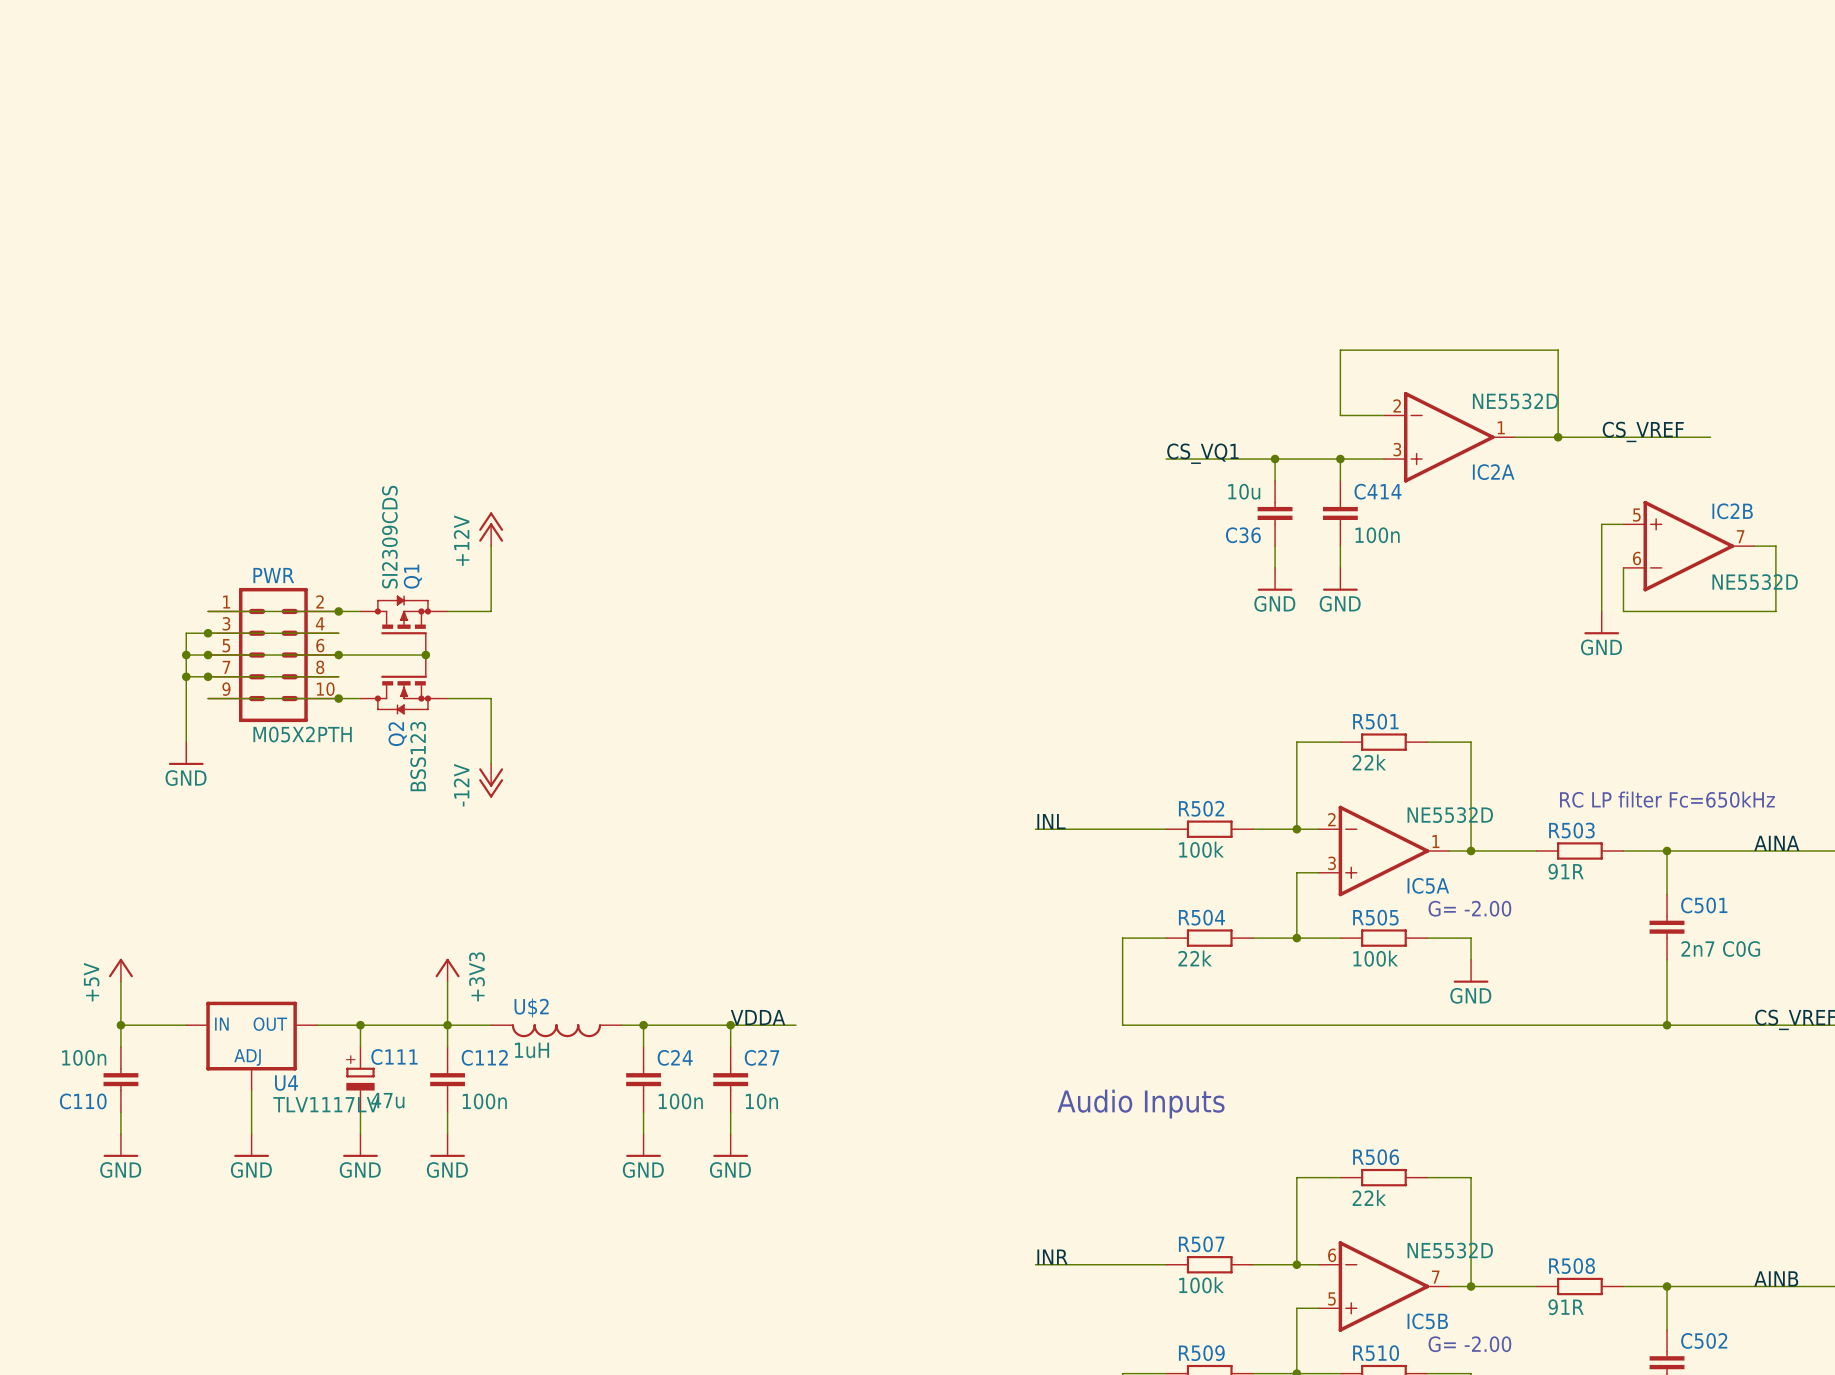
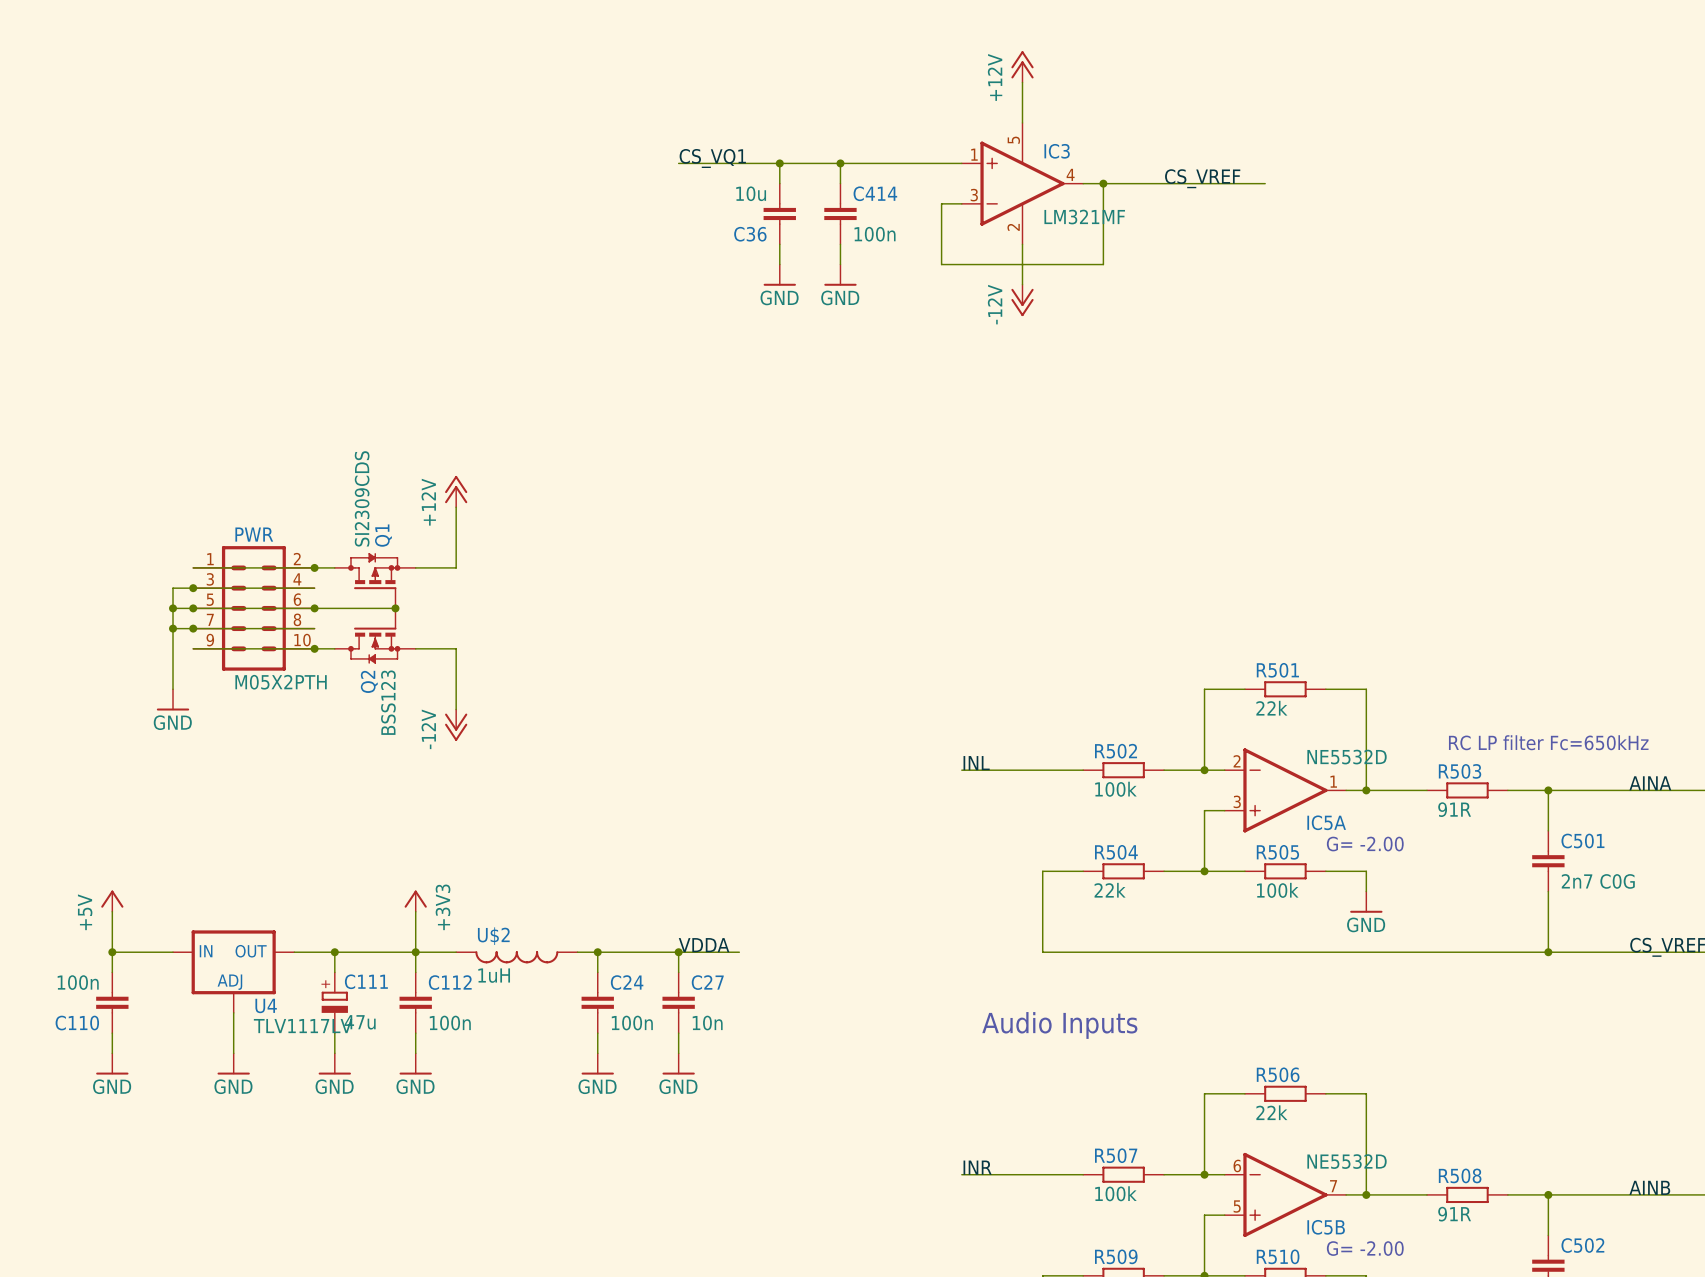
power symbol: none -> +12V (1022, 66)
wire: none -> (1022, 82) (1022, 122)
label: none -> CS_VQ1 (712, 158)
wire: none -> (678, 163) (961, 163)
wire: none -> (779, 163) (779, 183)
junction: none -> (779, 163)
wire: none -> (840, 163) (840, 183)
junction: none -> (840, 163)
label: none -> CS_VREF (1202, 178)
IC3: none -> LM321MF (1022, 183)
wire: none -> (1083, 183) (1265, 183)
wire: none -> (1103, 183) (1103, 264) (941, 264) (941, 203) (961, 203)
junction: none -> (1103, 183)
wire: none -> (779, 244) (779, 264)
wire: none -> (840, 244) (840, 264)
wire: none -> (1022, 244) (1022, 284)
power symbol: none -> GND (779, 275)
power symbol: none -> GND (840, 275)
power symbol: none -> -12V (1022, 300)
wire: (1383, 415) (1340, 415) (1340, 350) (1558, 350) (1558, 437) -> none
label: CS_VREF (1643, 431) -> none
IC2A: NE5532D (1449, 437) -> none
wire: (1514, 437) (1710, 437) -> none
junction: (1558, 437) -> none
label: CS_VQ1 (1202, 453) -> none
wire: (1166, 459) (1383, 459) -> none
wire: (1275, 459) (1275, 480) -> none
junction: (1275, 459) -> none
wire: (1340, 459) (1340, 480) -> none
junction: (1340, 459) -> none
C36 position: (1275, 513) -> (779, 213)
C414 position: (1340, 513) -> (840, 213)
wire: (1623, 524) (1601, 524) (1601, 611) -> none
wire: (1275, 546) (1275, 567) -> none
wire: (1340, 546) (1340, 567) -> none
IC2B: NE5532D (1688, 546) -> none
wire: (1754, 546) (1775, 546) (1775, 611) (1623, 611) (1623, 567) -> none
power symbol: GND (1275, 579) -> none
power symbol: GND (1340, 579) -> none
power symbol: GND (1601, 622) -> none

